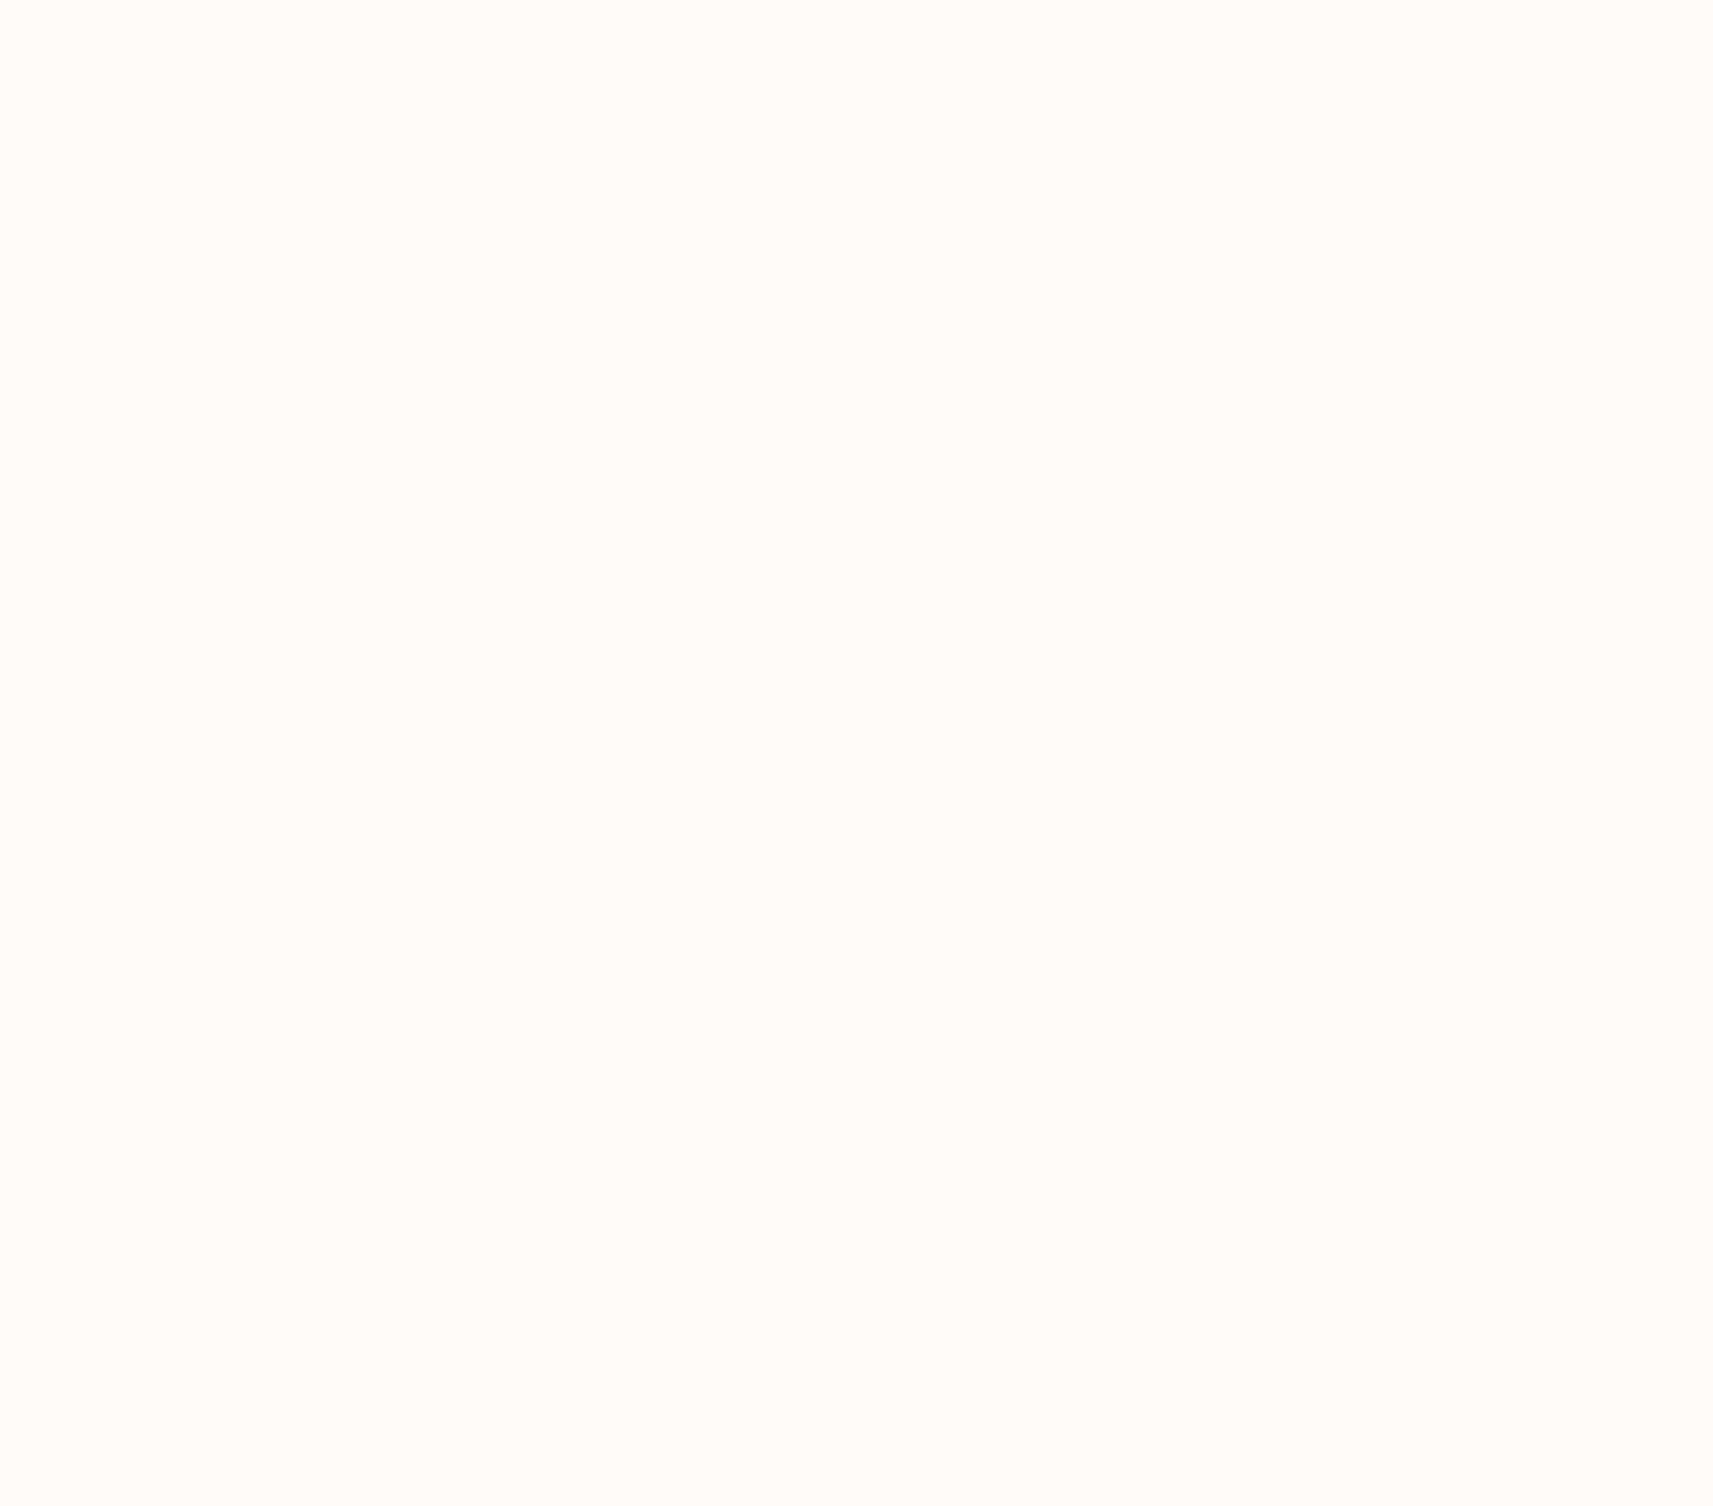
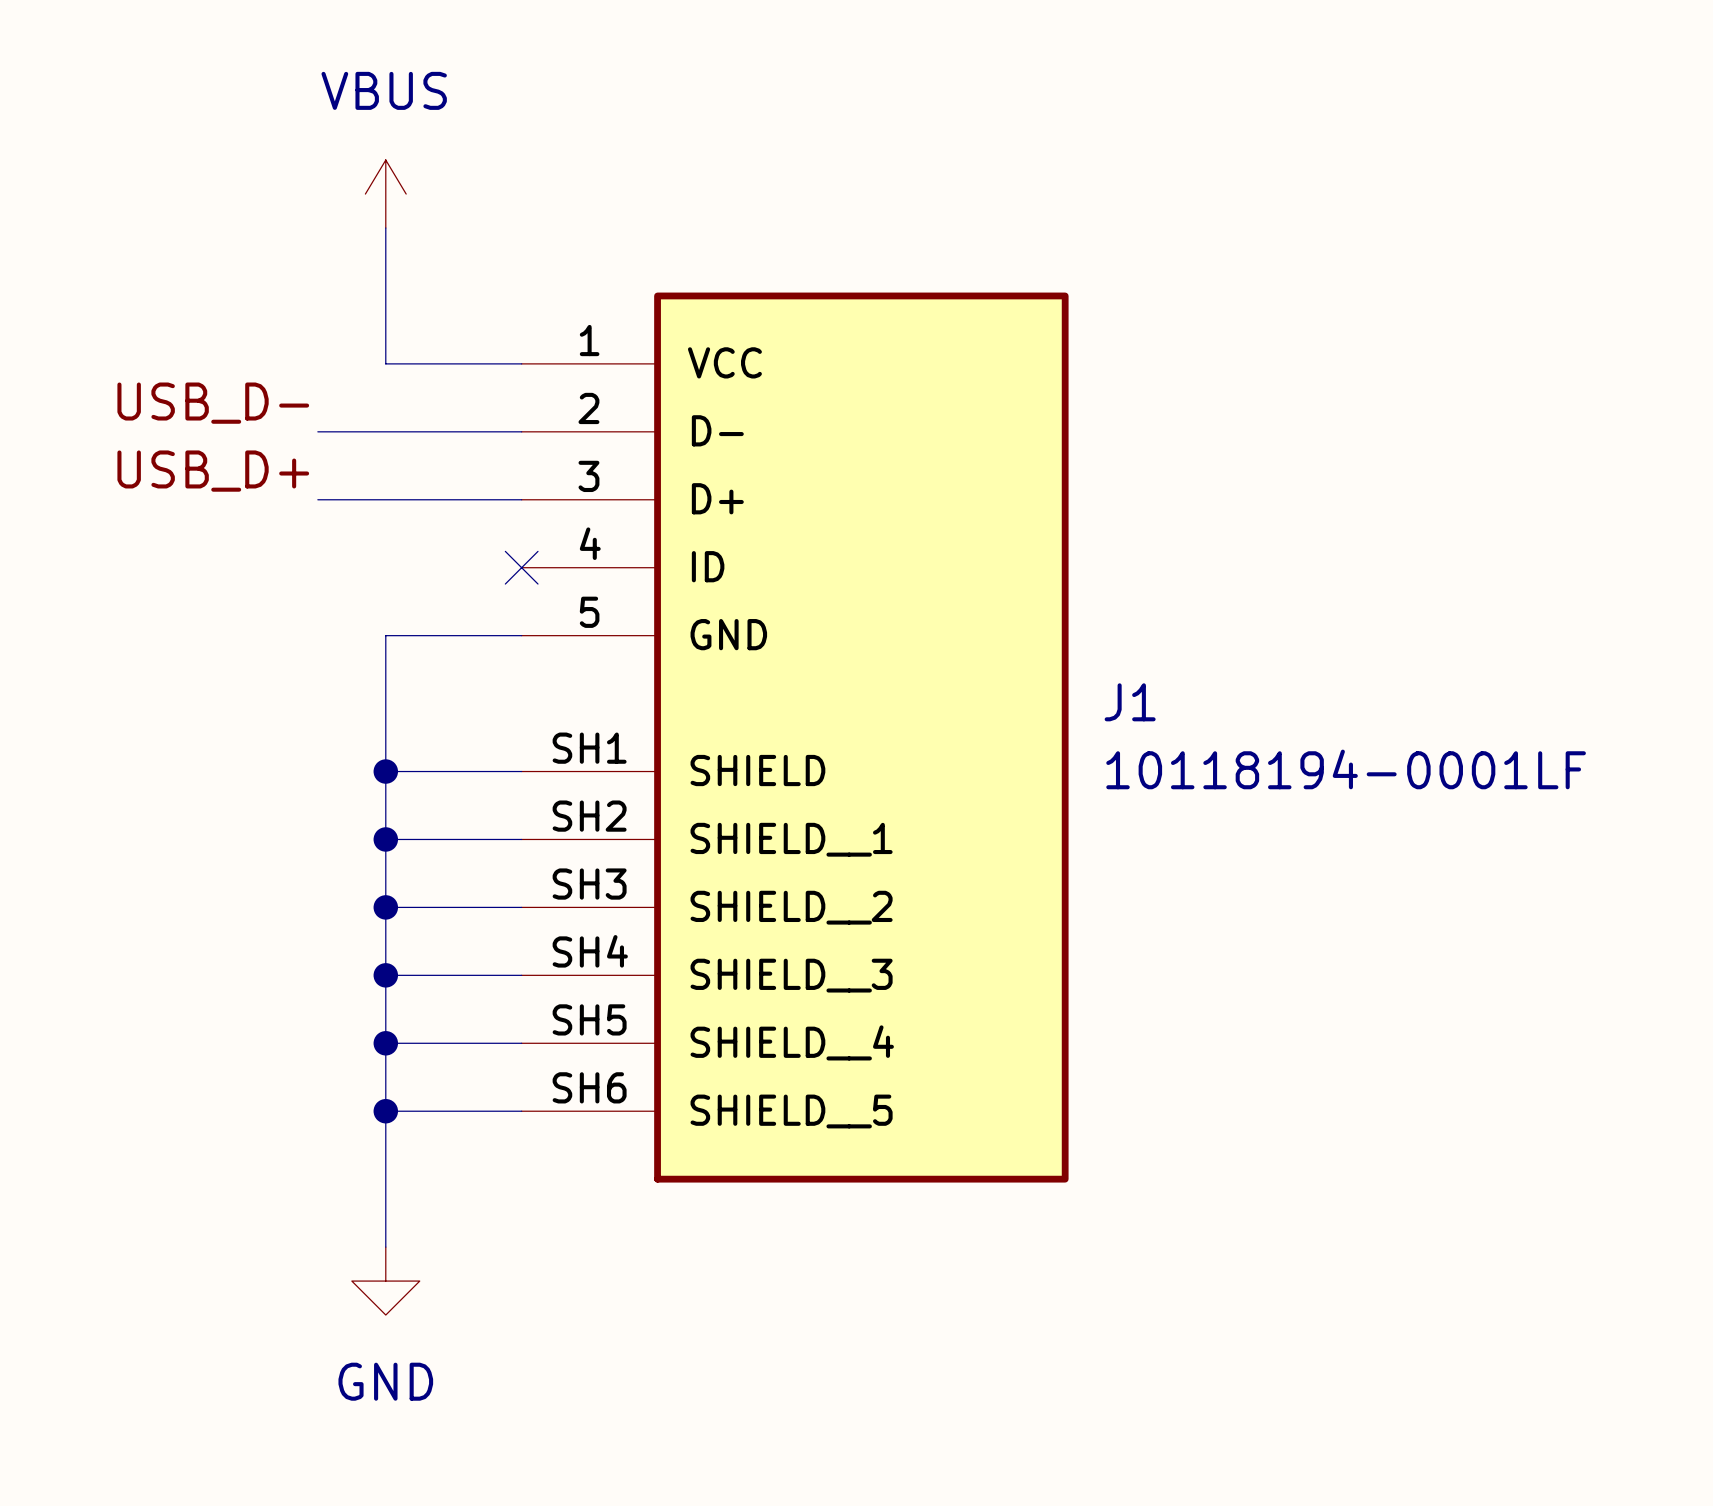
power symbol: none -> VBUS (385, 194)
wire: none -> (385, 228) (385, 363) (521, 363)
label: none -> USB_D- (213, 403)
wire: none -> (317, 431) (521, 431)
label: none -> USB_D+ (213, 471)
wire: none -> (317, 499) (521, 499)
no-connect mark: none -> (521, 567)
wire: none -> (521, 635) (385, 635) (385, 1247)
J1: none -> 10118194-0001LF (795, 737)
wire: none -> (385, 771) (521, 771)
junction: none -> (385, 771)
wire: none -> (385, 839) (521, 839)
junction: none -> (385, 839)
wire: none -> (385, 907) (521, 907)
junction: none -> (385, 907)
wire: none -> (385, 975) (521, 975)
junction: none -> (385, 975)
wire: none -> (385, 1043) (521, 1043)
junction: none -> (385, 1043)
wire: none -> (385, 1111) (521, 1111)
junction: none -> (385, 1111)
power symbol: none -> GND (385, 1281)

